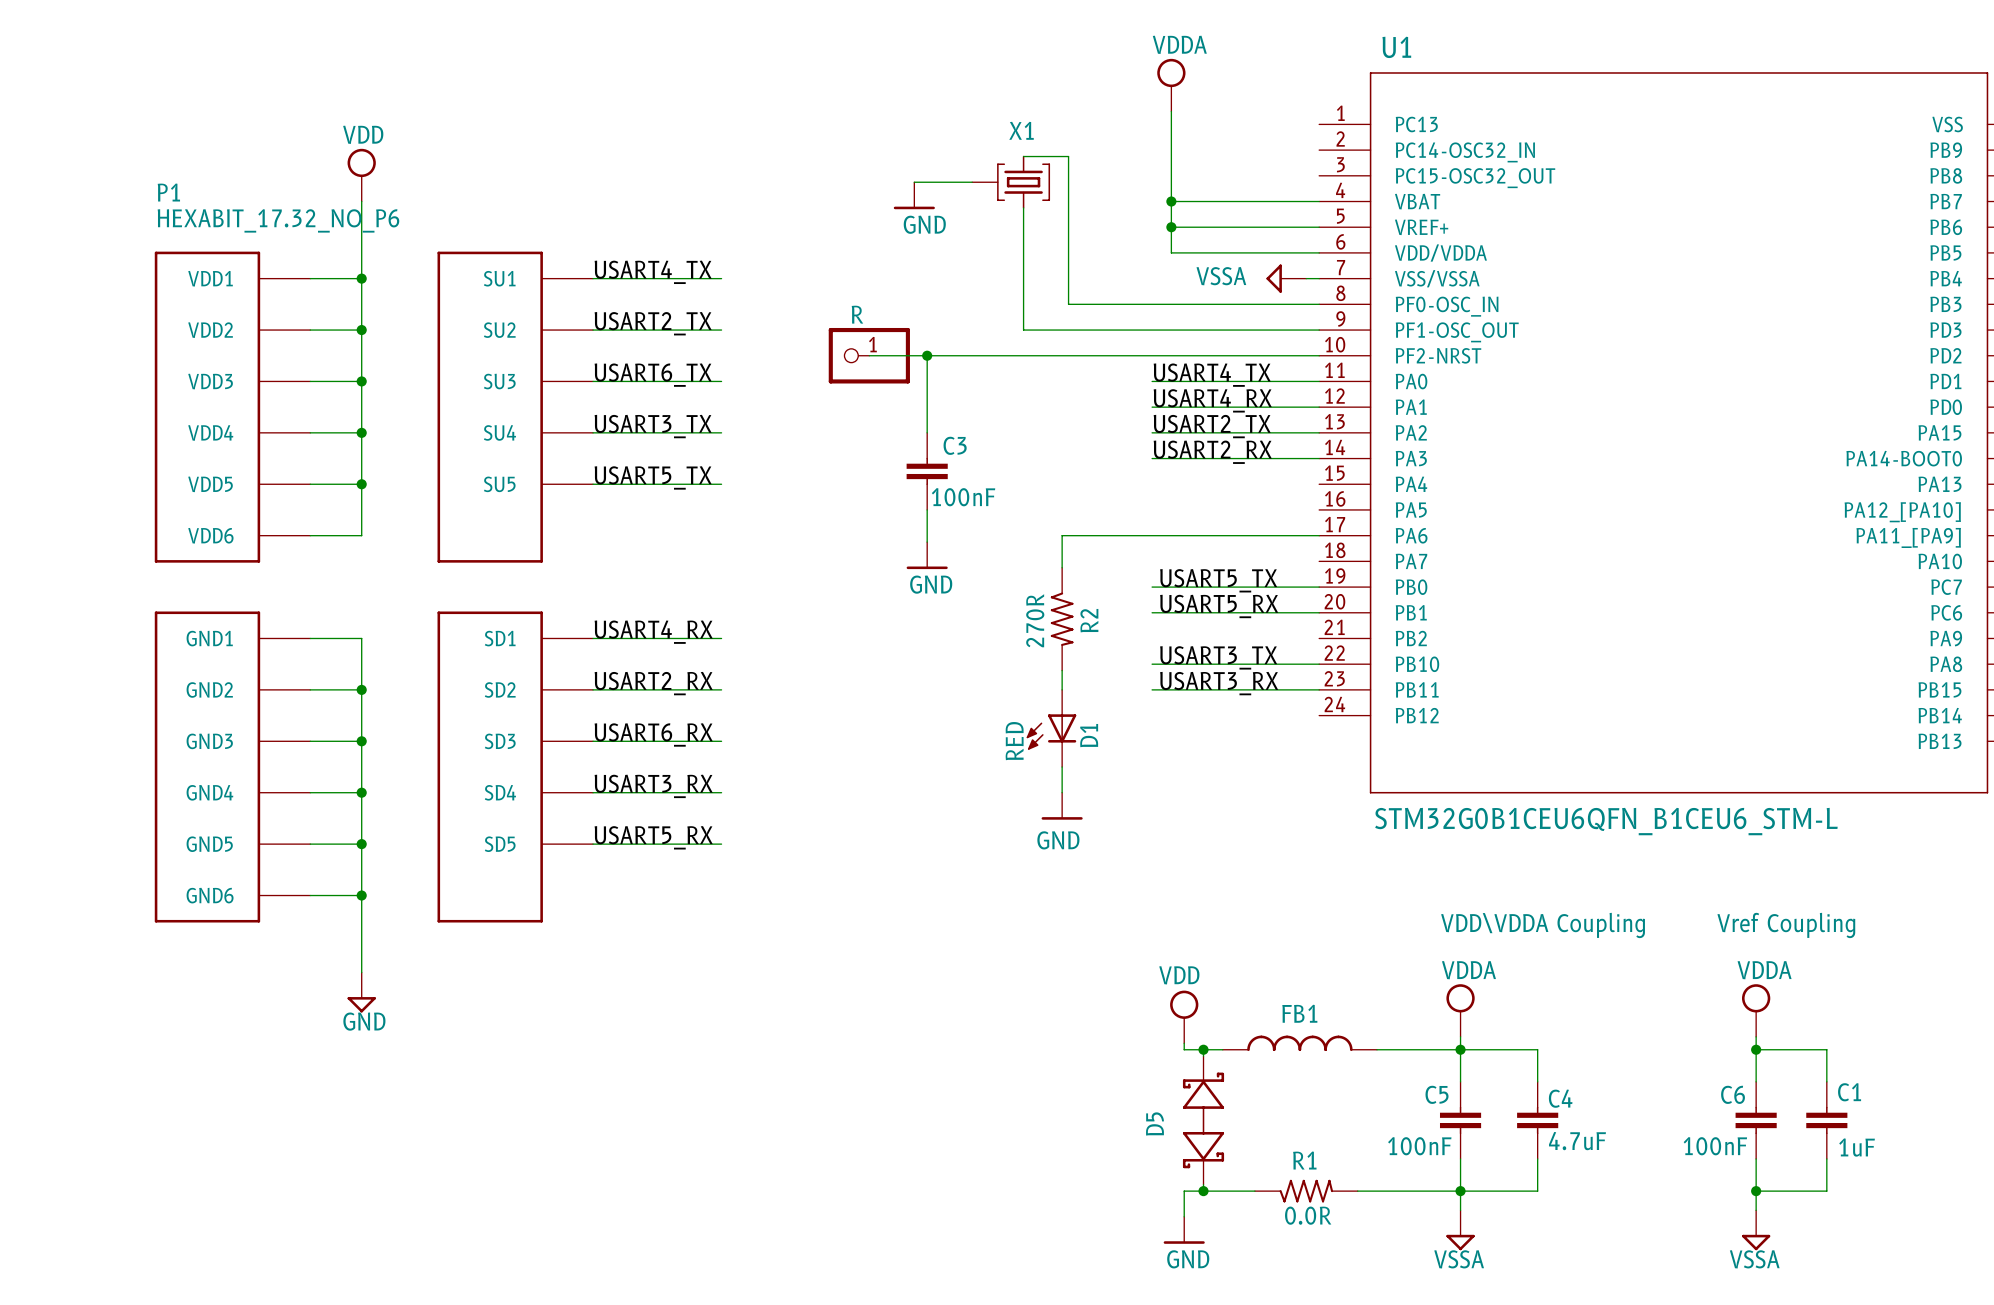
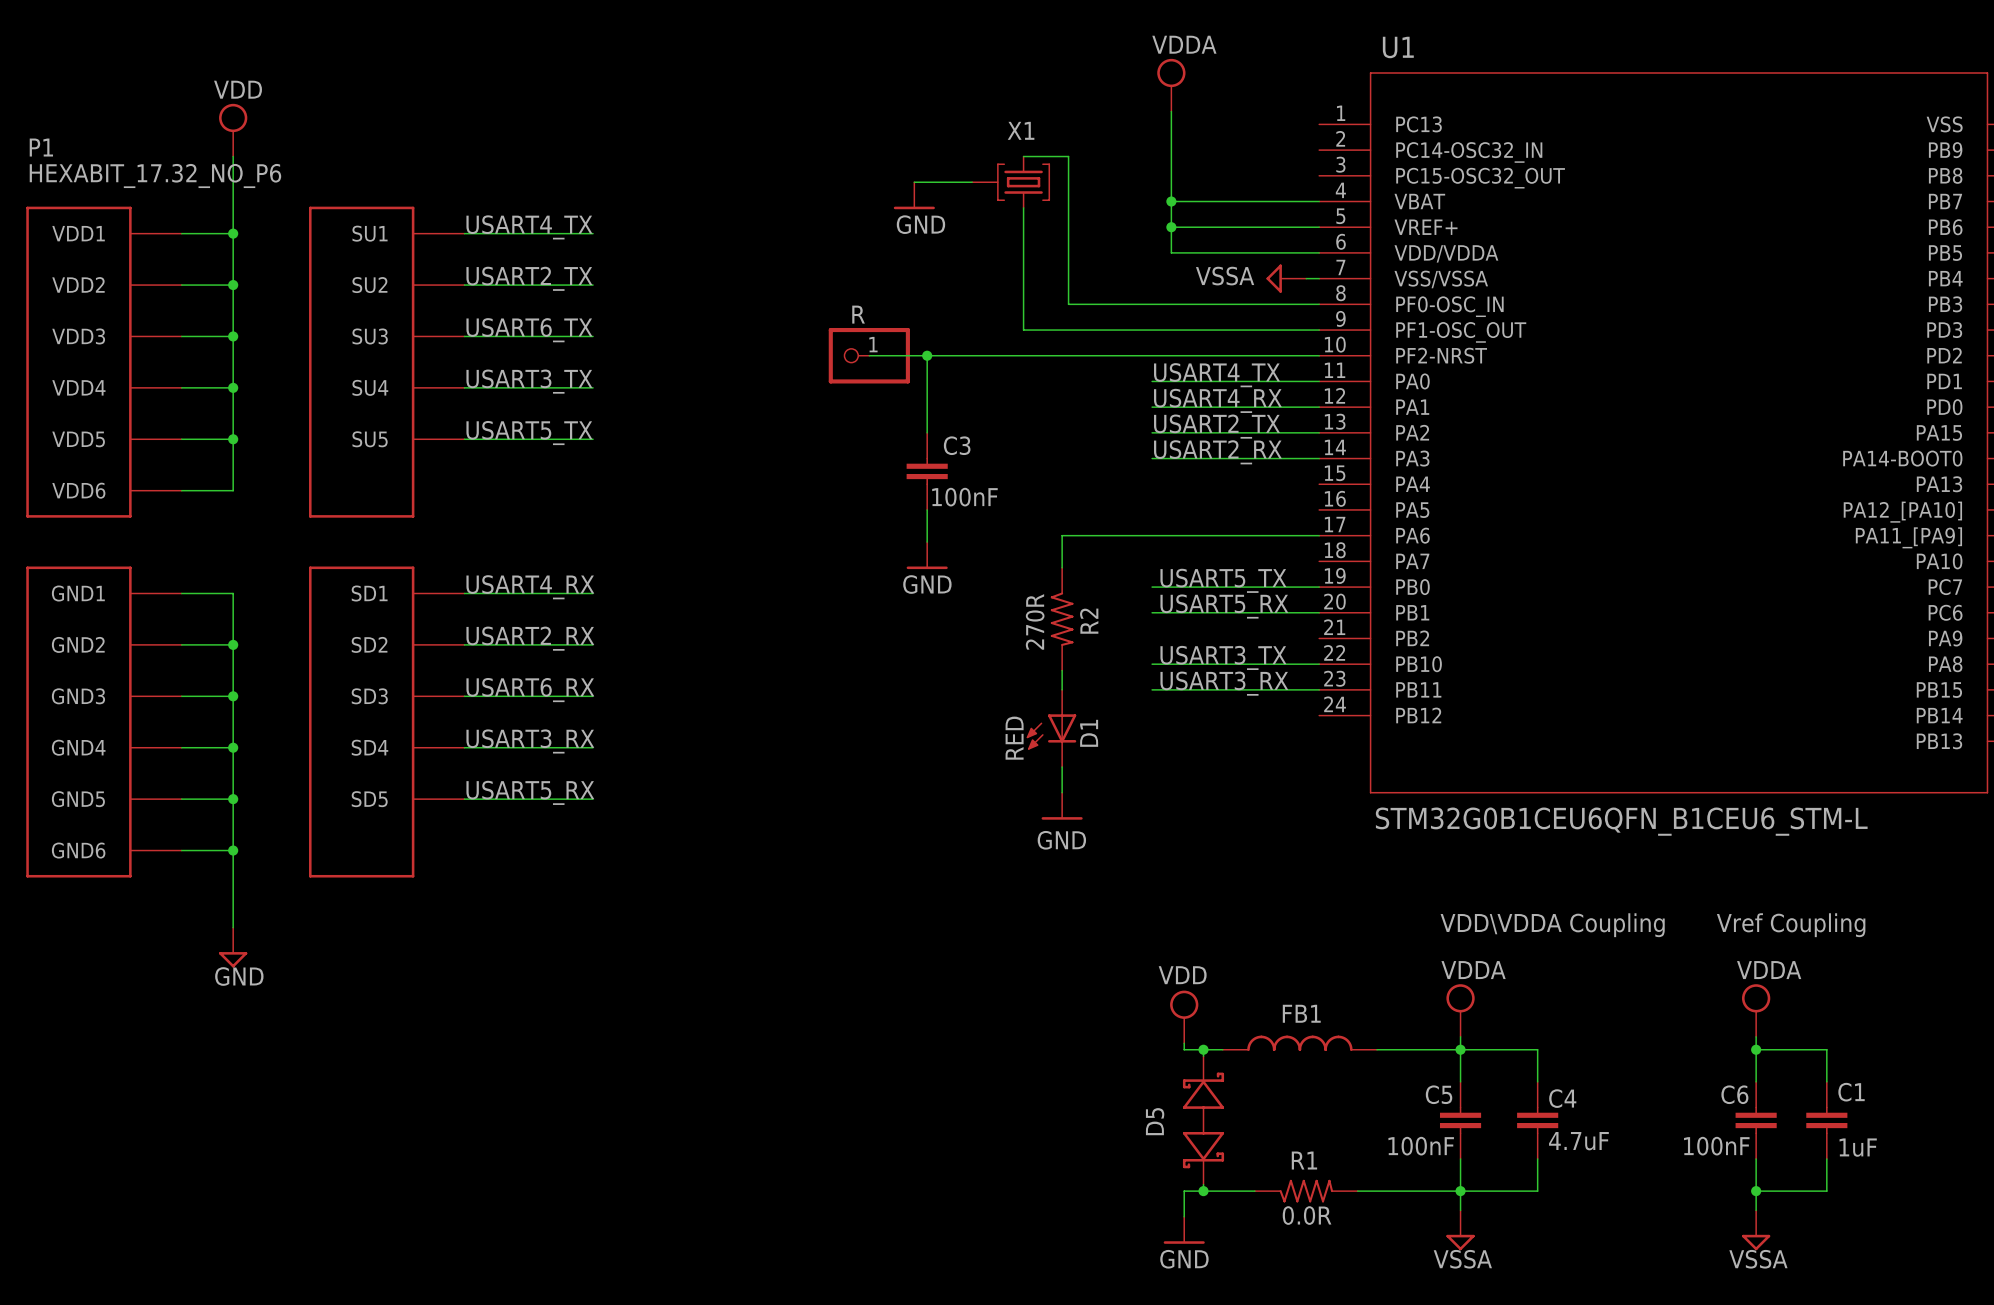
power symbol position: VDD (361, 175) -> VDD (233, 130)
wire: (361, 201) (361, 535) (310, 535) -> (233, 156) (233, 490) (181, 490)
junction: none -> (233, 233)
label position: USART4_TX (653, 272) -> USART4_TX (529, 227)
wire: (310, 278) (361, 278) -> (181, 233) (233, 233)
junction: (361, 278) -> none
wire: (593, 278) (721, 278) -> (464, 233) (593, 233)
junction: none -> (233, 285)
label position: USART2_TX (653, 323) -> USART2_TX (529, 278)
wire: (310, 330) (361, 330) -> (181, 285) (233, 285)
junction: (361, 330) -> none
wire: (593, 330) (721, 330) -> (464, 285) (593, 285)
junction: none -> (233, 336)
label position: USART6_TX (653, 375) -> USART6_TX (529, 330)
wire: (310, 381) (361, 381) -> (181, 336) (233, 336)
junction: (361, 381) -> none
wire: (593, 381) (721, 381) -> (464, 336) (593, 336)
junction: none -> (233, 387)
label position: USART3_TX (653, 426) -> USART3_TX (529, 381)
wire: (310, 432) (361, 432) -> (181, 387) (233, 387)
junction: (361, 432) -> none
wire: (593, 432) (721, 432) -> (464, 387) (593, 387)
junction: none -> (233, 439)
label position: USART5_TX (653, 477) -> USART5_TX (529, 433)
wire: (310, 484) (361, 484) -> (181, 439) (233, 439)
junction: (361, 484) -> none
wire: (593, 484) (721, 484) -> (464, 439) (593, 439)
P1 position: (373, 587) -> (245, 542)
label position: USART4_RX (653, 632) -> USART4_RX (530, 587)
wire: (310, 638) (361, 638) (361, 972) -> (181, 593) (233, 593) (233, 927)
wire: (593, 638) (721, 638) -> (464, 593) (593, 593)
junction: none -> (233, 644)
label position: USART2_RX (653, 683) -> USART2_RX (530, 638)
wire: (310, 689) (361, 689) -> (181, 644) (233, 644)
junction: (361, 689) -> none
wire: (593, 689) (721, 689) -> (464, 644) (593, 644)
junction: none -> (233, 696)
label position: USART6_RX (653, 734) -> USART6_RX (530, 690)
wire: (310, 741) (361, 741) -> (181, 696) (233, 696)
junction: (361, 741) -> none
wire: (593, 741) (721, 741) -> (464, 696) (593, 696)
junction: none -> (233, 747)
label position: USART3_RX (653, 786) -> USART3_RX (530, 741)
wire: (310, 792) (361, 792) -> (181, 747) (233, 747)
junction: (361, 792) -> none
wire: (593, 792) (721, 792) -> (464, 747) (593, 747)
junction: none -> (233, 799)
label position: USART5_RX (653, 837) -> USART5_RX (530, 792)
wire: (310, 844) (361, 844) -> (181, 799) (233, 799)
junction: (361, 844) -> none
wire: (593, 844) (721, 844) -> (464, 799) (593, 799)
junction: none -> (233, 850)
wire: (310, 895) (361, 895) -> (181, 850) (233, 850)
junction: (361, 895) -> none
power symbol position: GND (361, 992) -> GND (233, 947)

